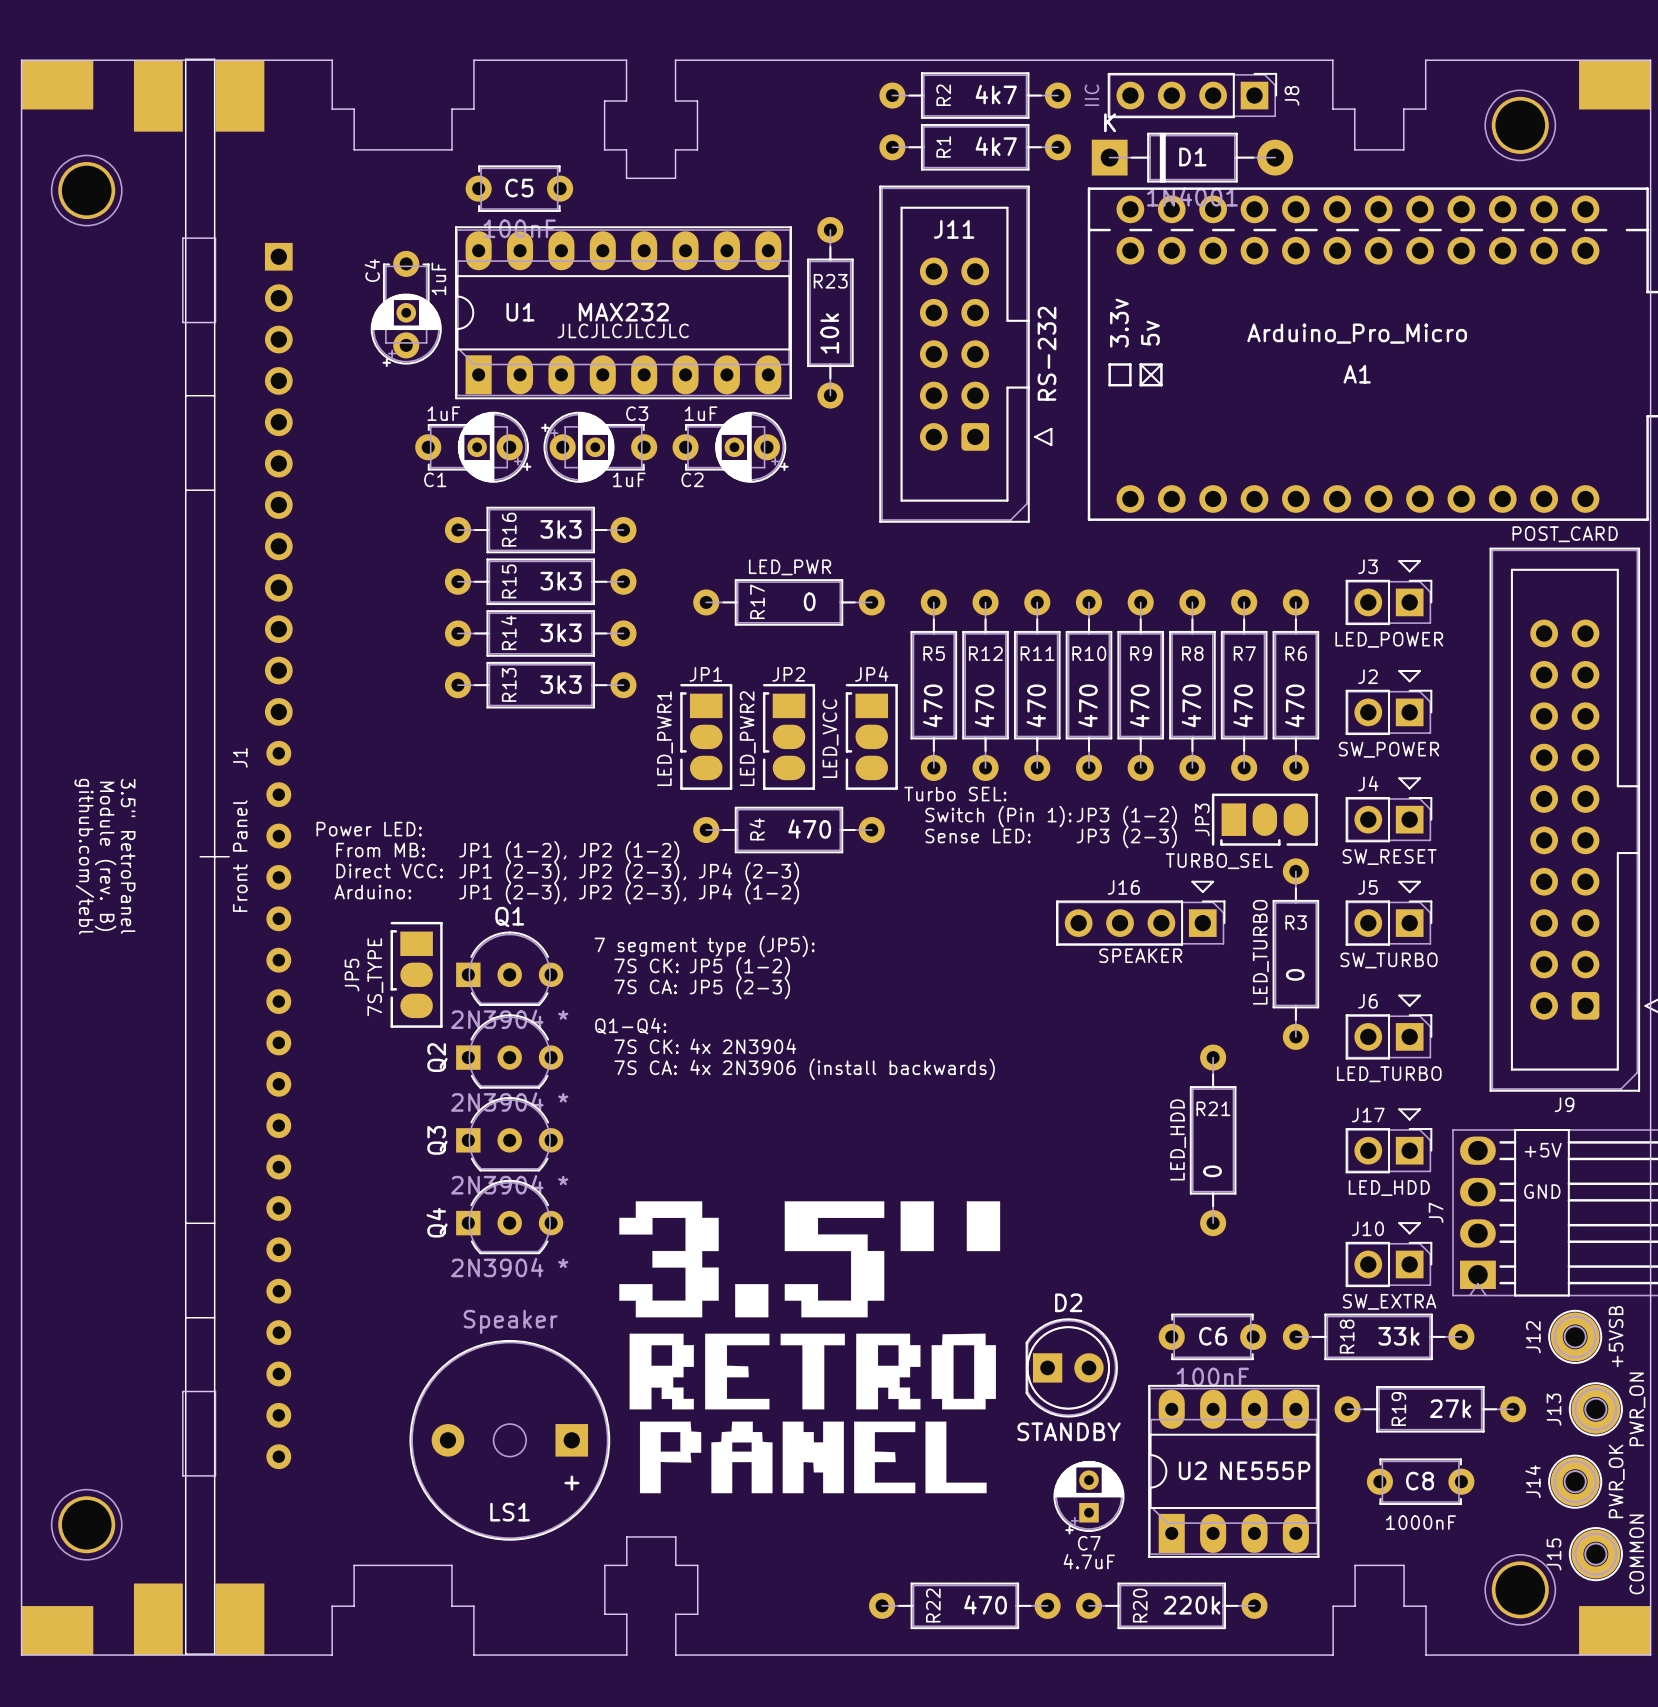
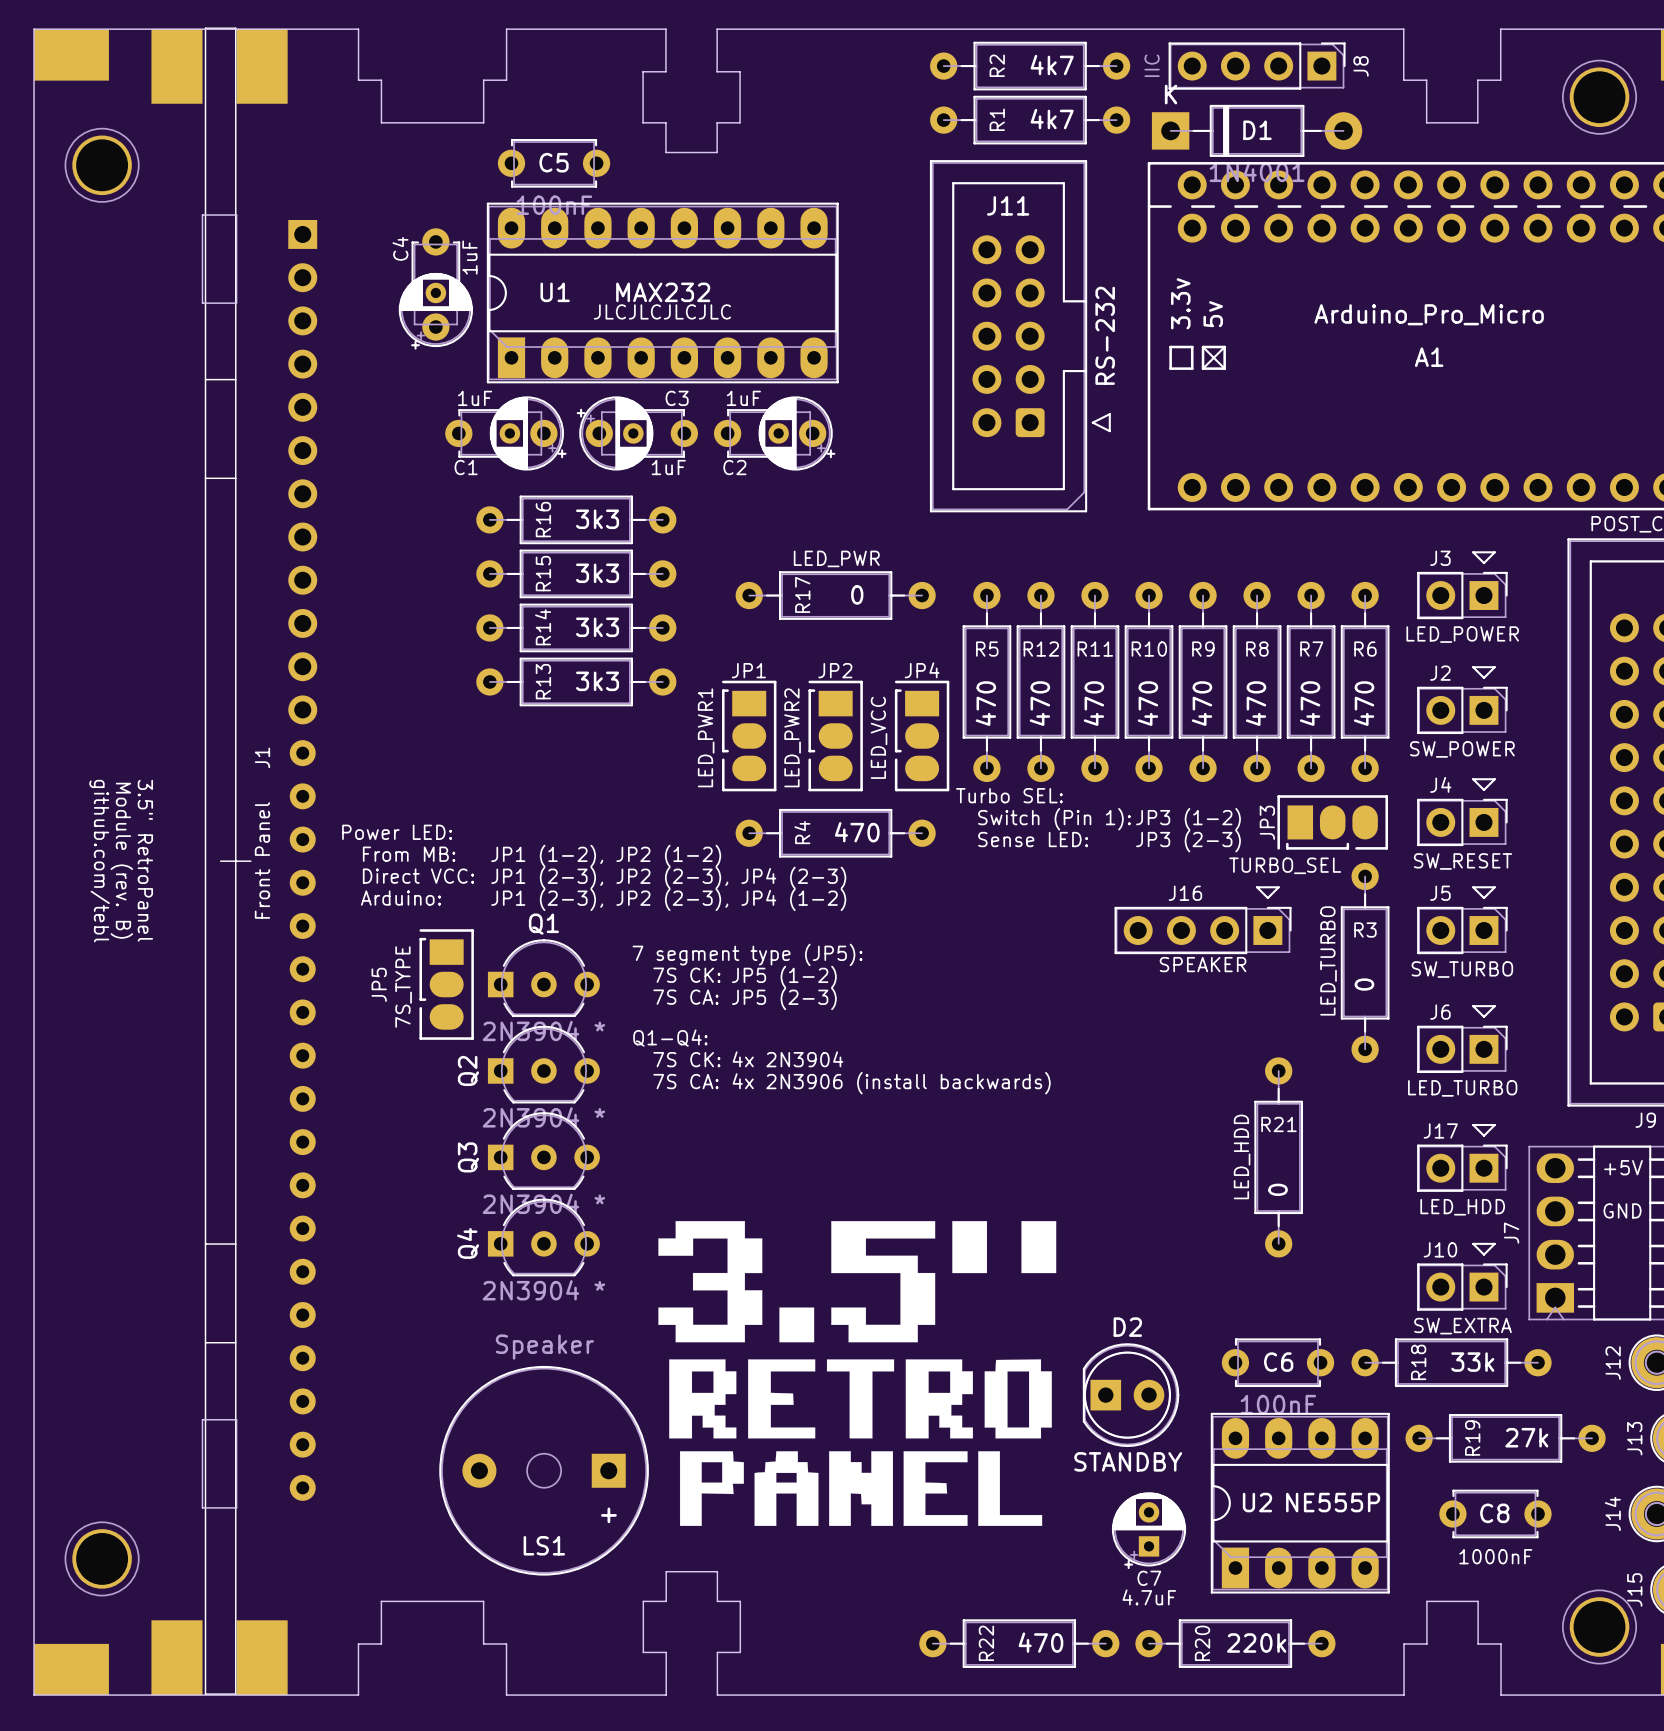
R23: 10k (830, 312) -> none

